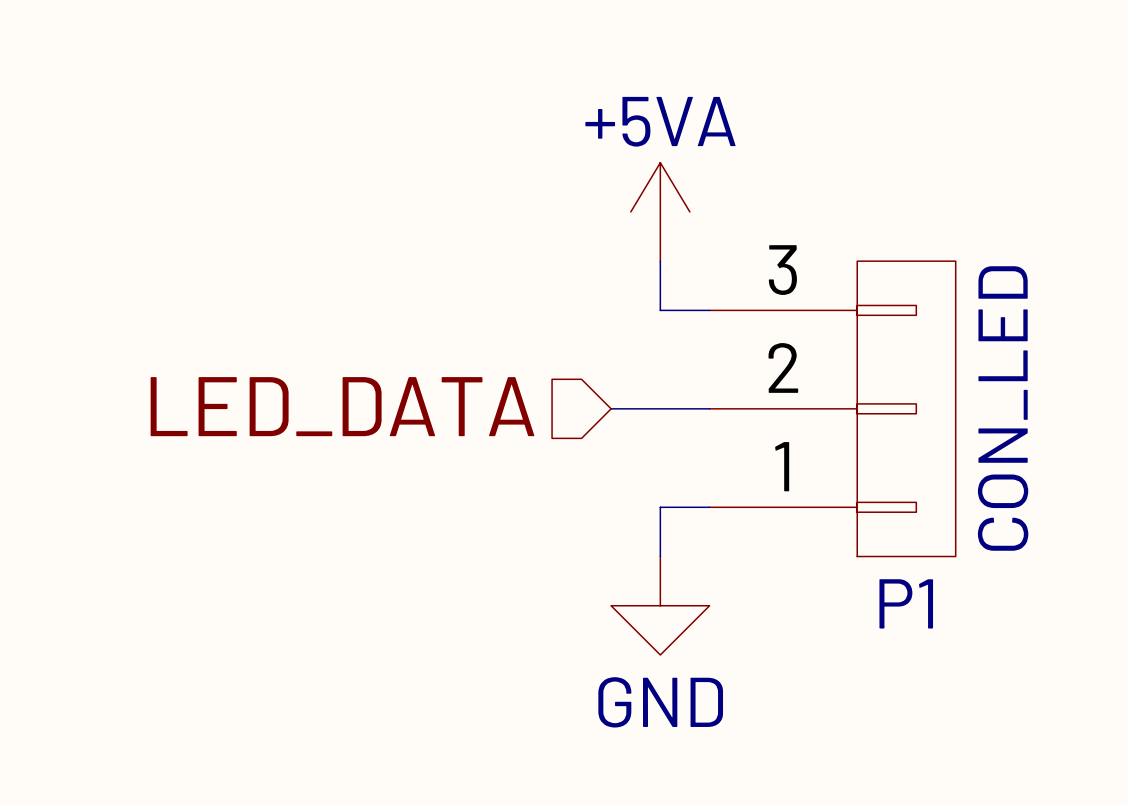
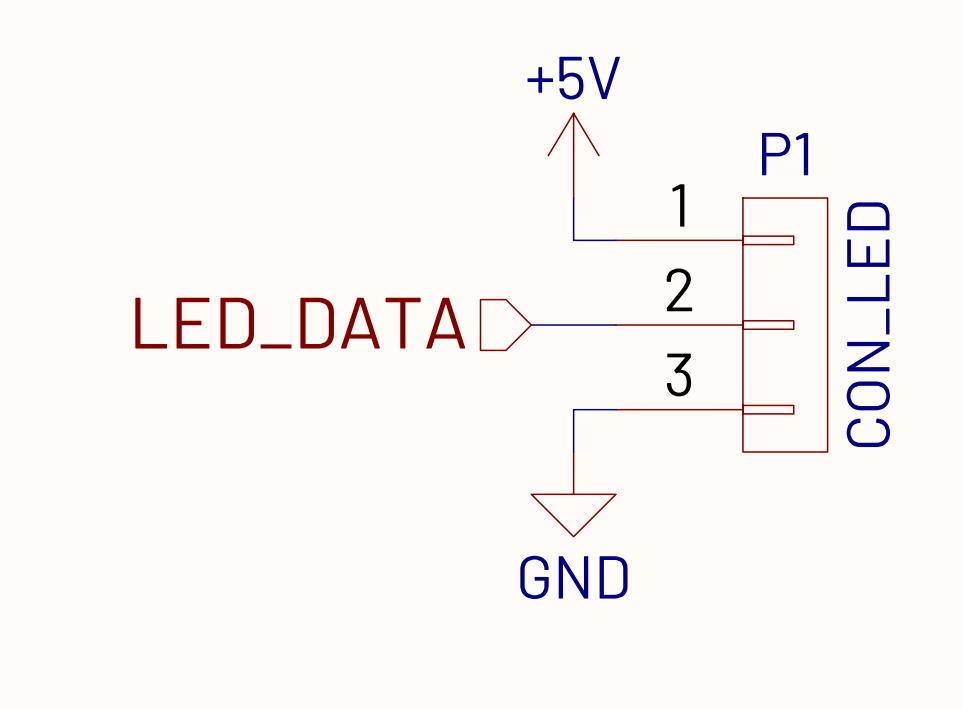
power symbol: +5VA (660, 211) -> +5V (573, 155)
P1 flip: as is (906, 408) -> up-down (785, 325)

